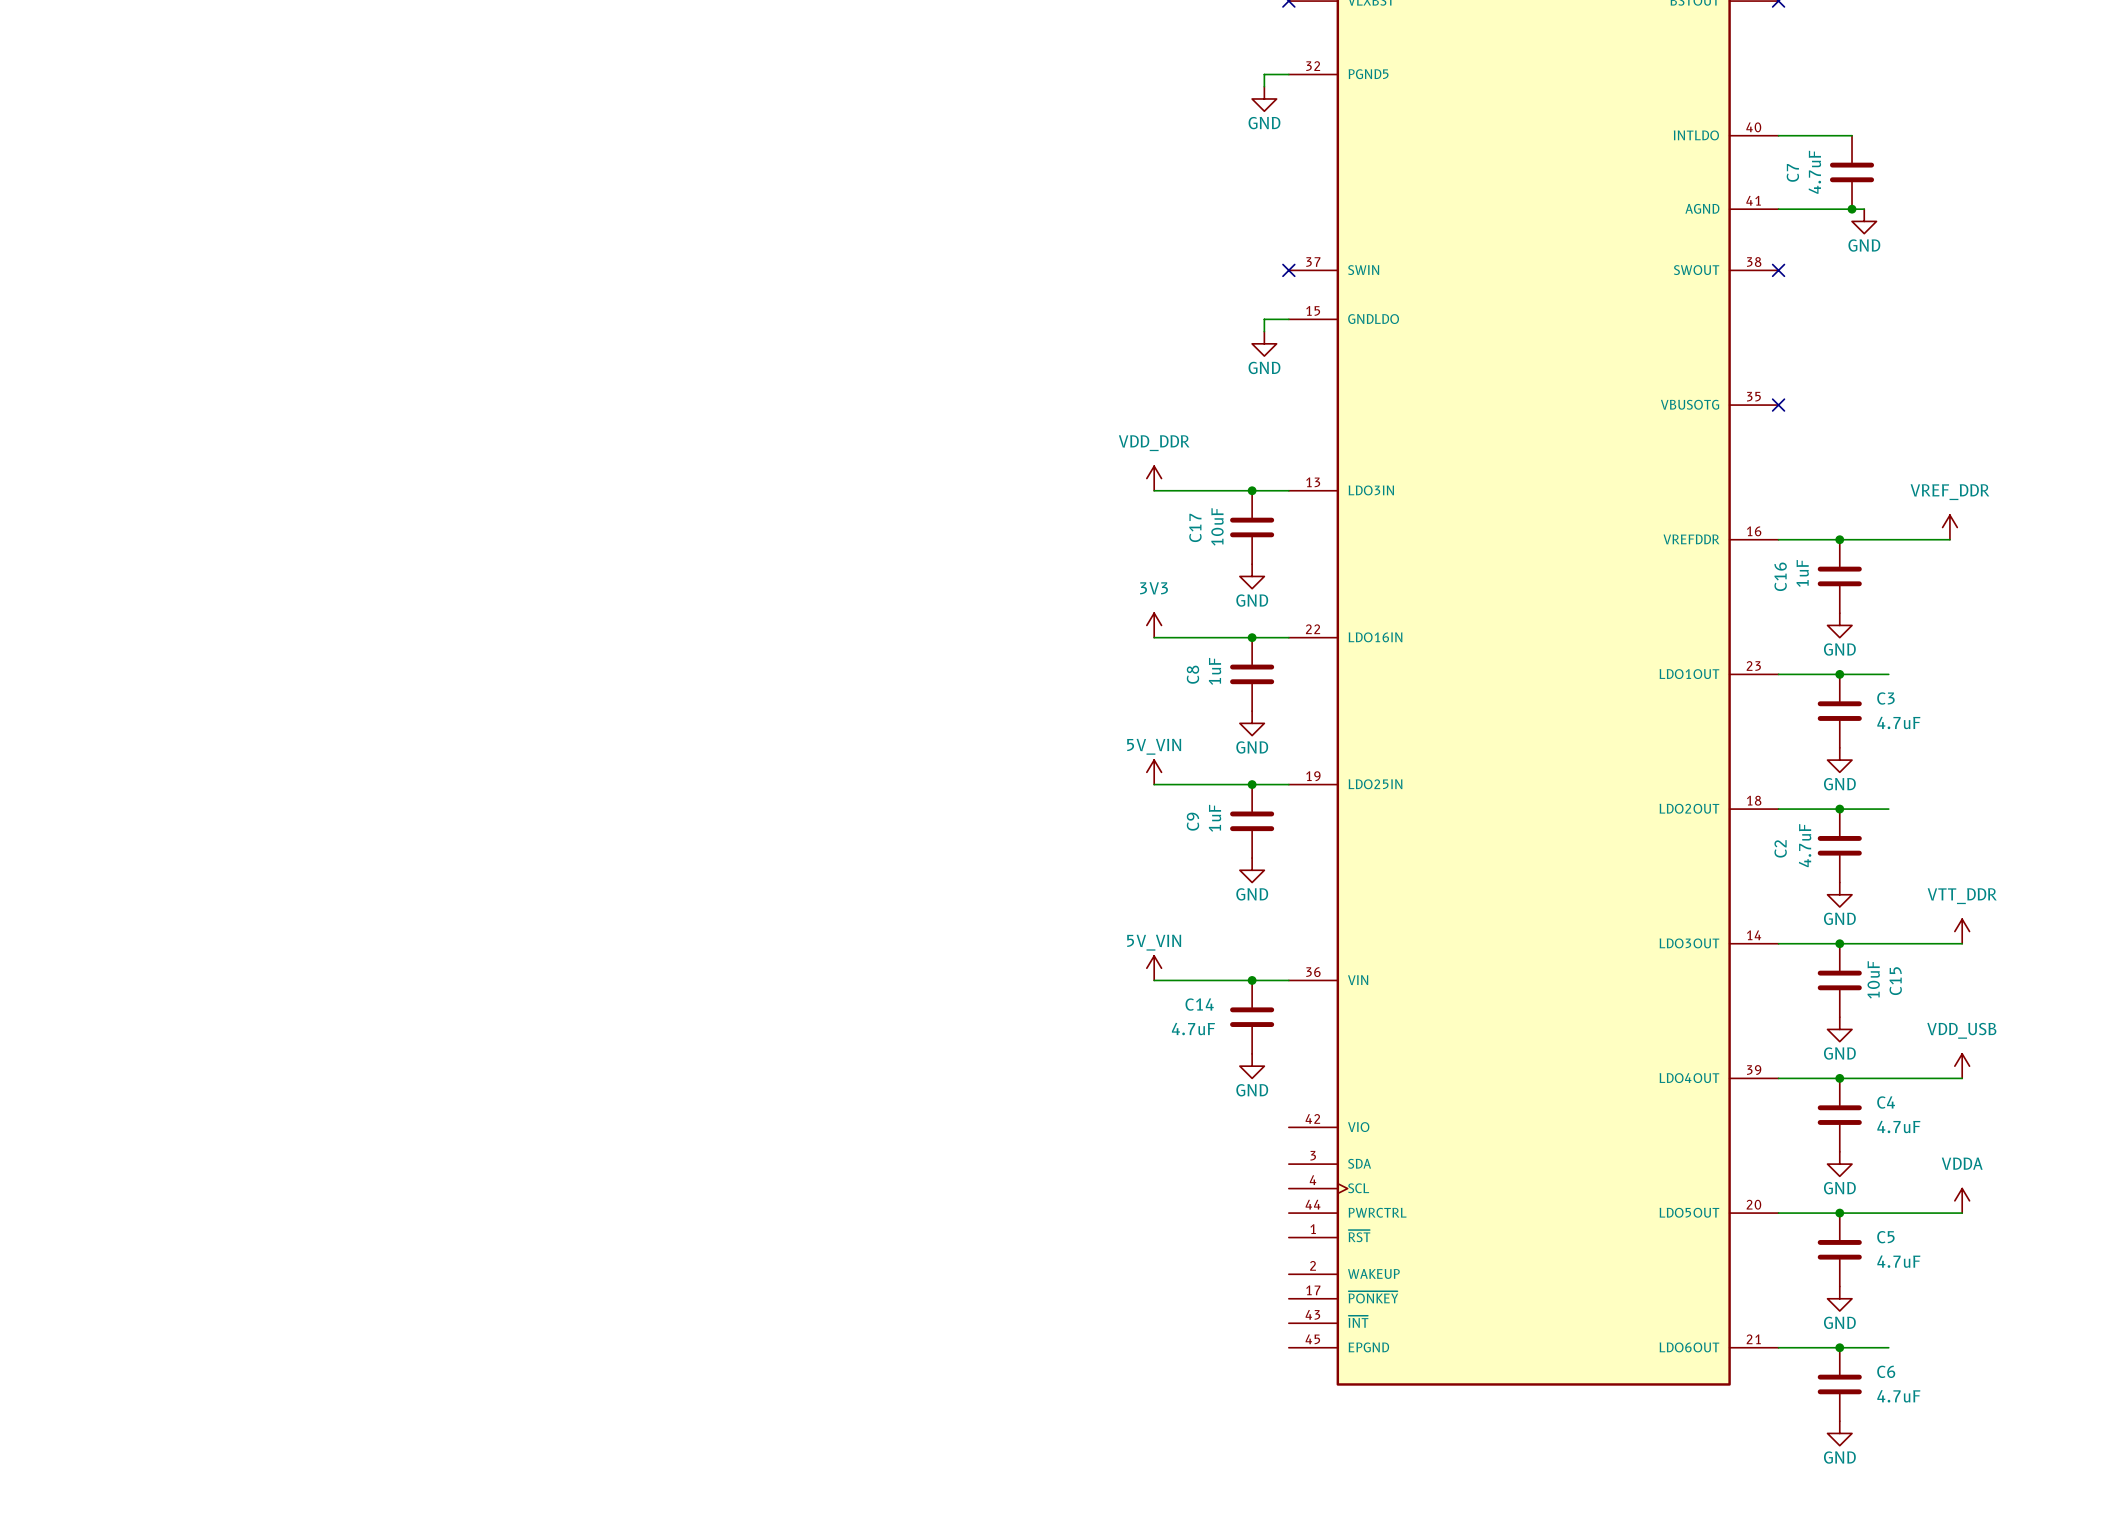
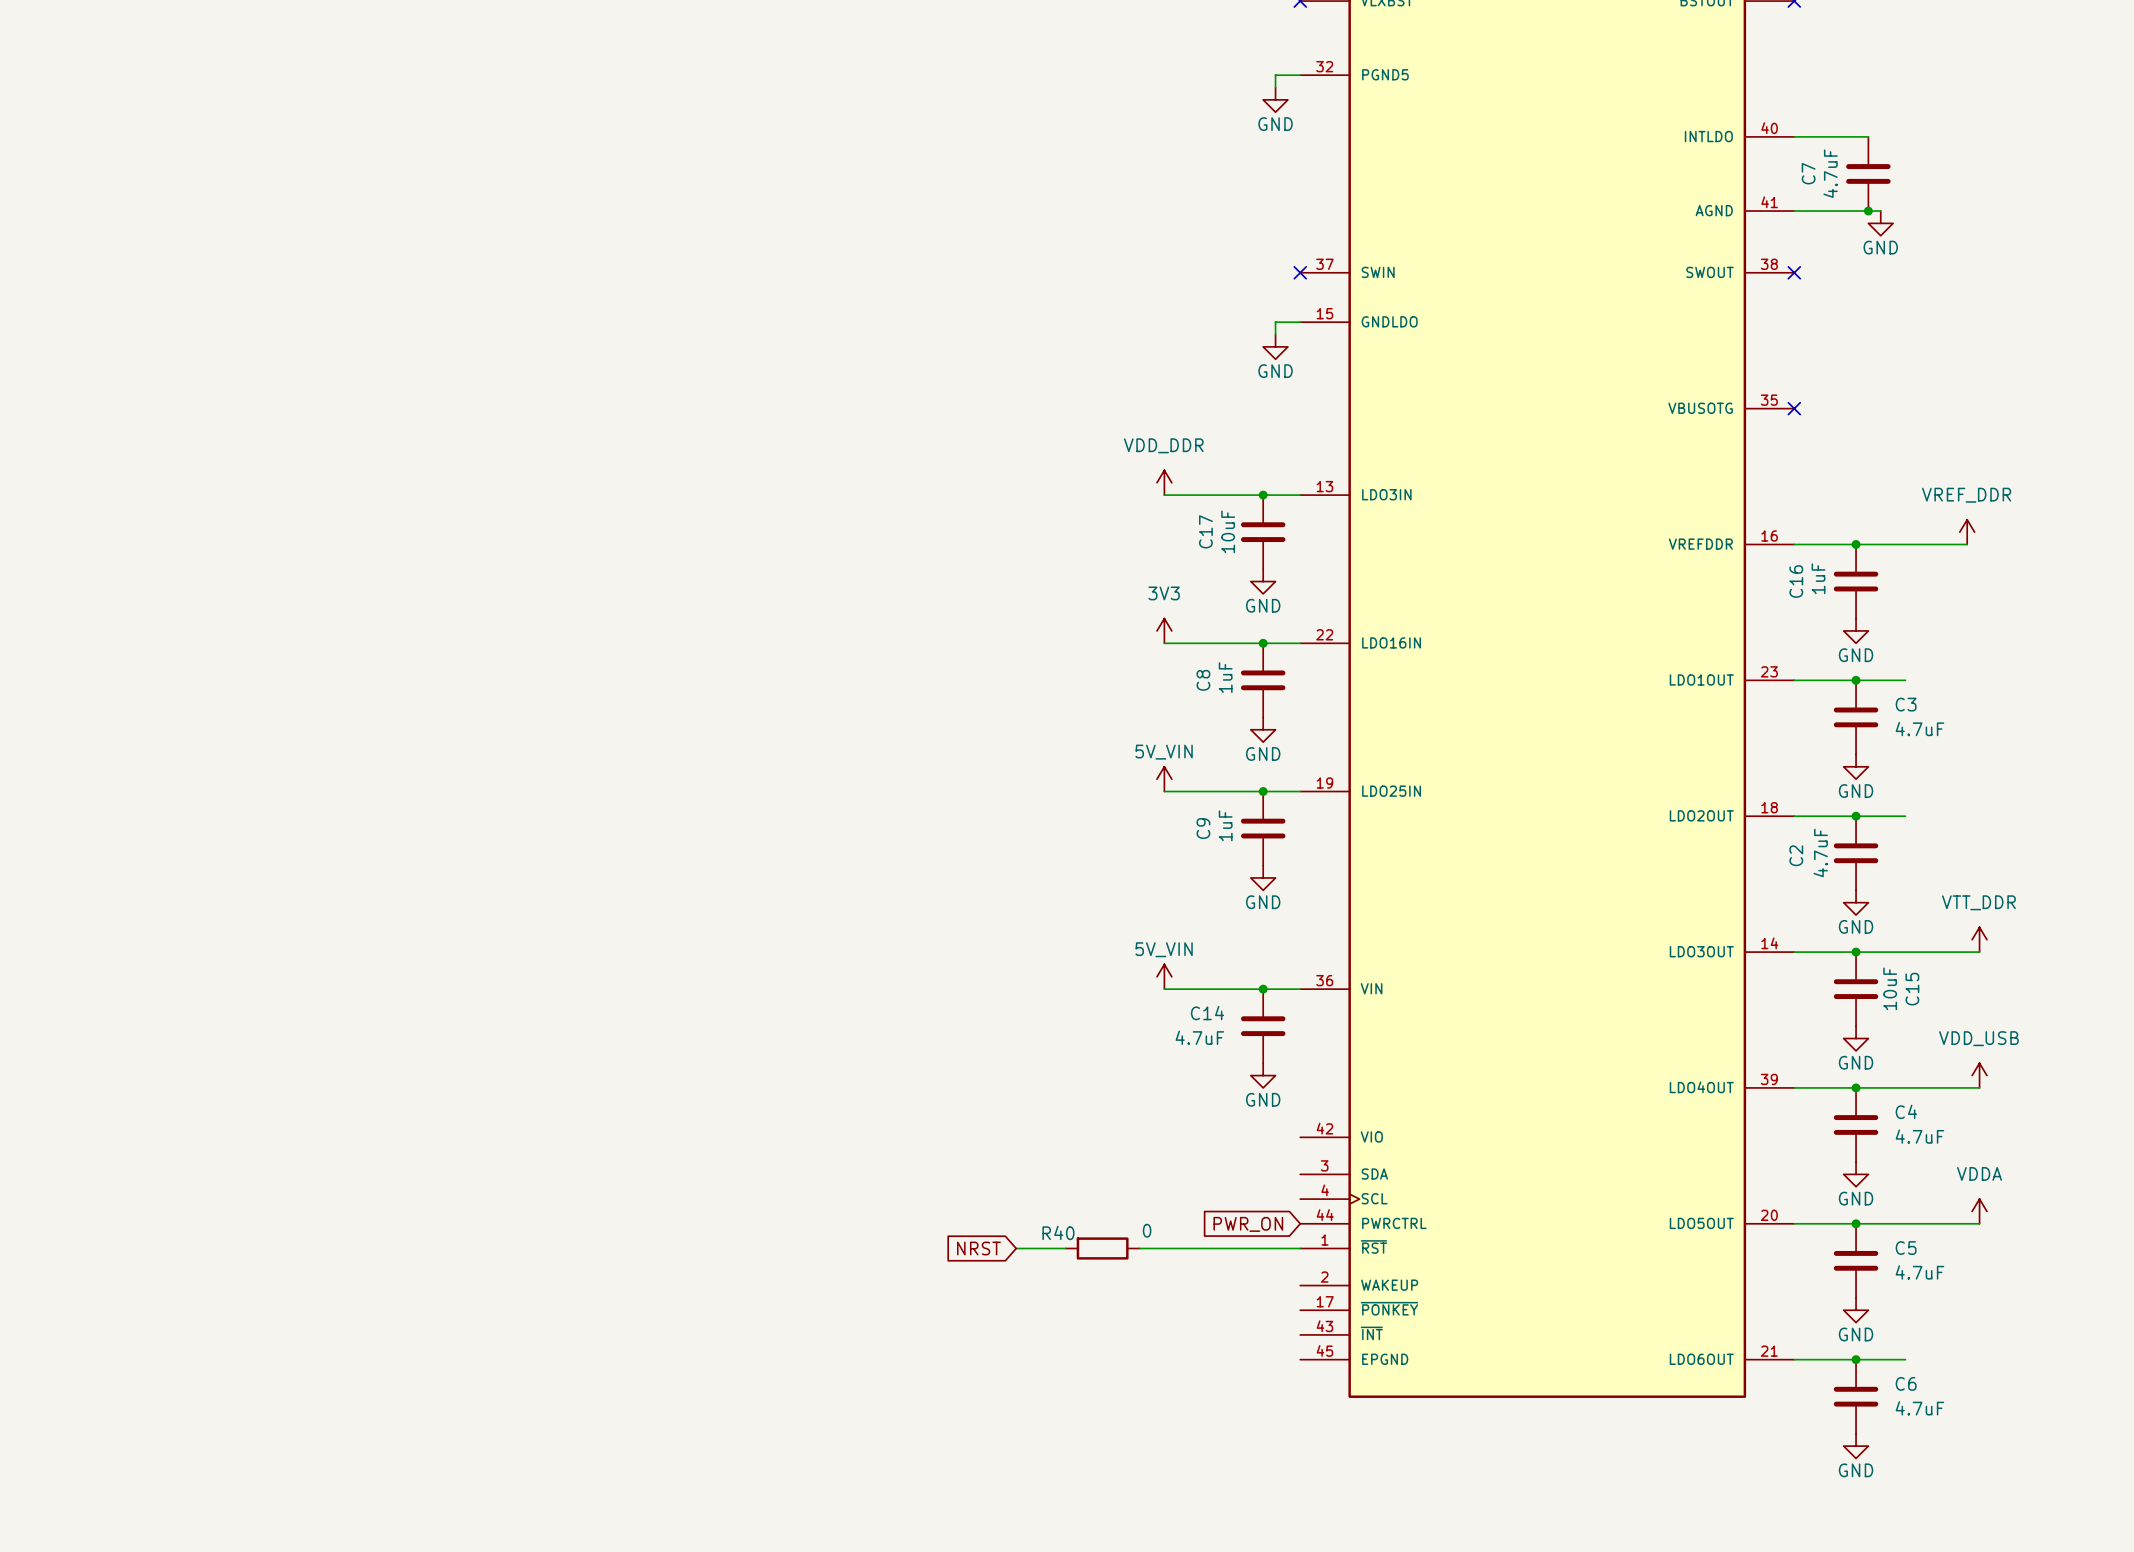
global label: none -> PWR_ON (1248, 1224)
global label: none -> NRST (978, 1248)
wire: none -> (1016, 1248) (1065, 1248)
R40: none -> 0 (1102, 1248)
wire: none -> (1139, 1248) (1300, 1248)

